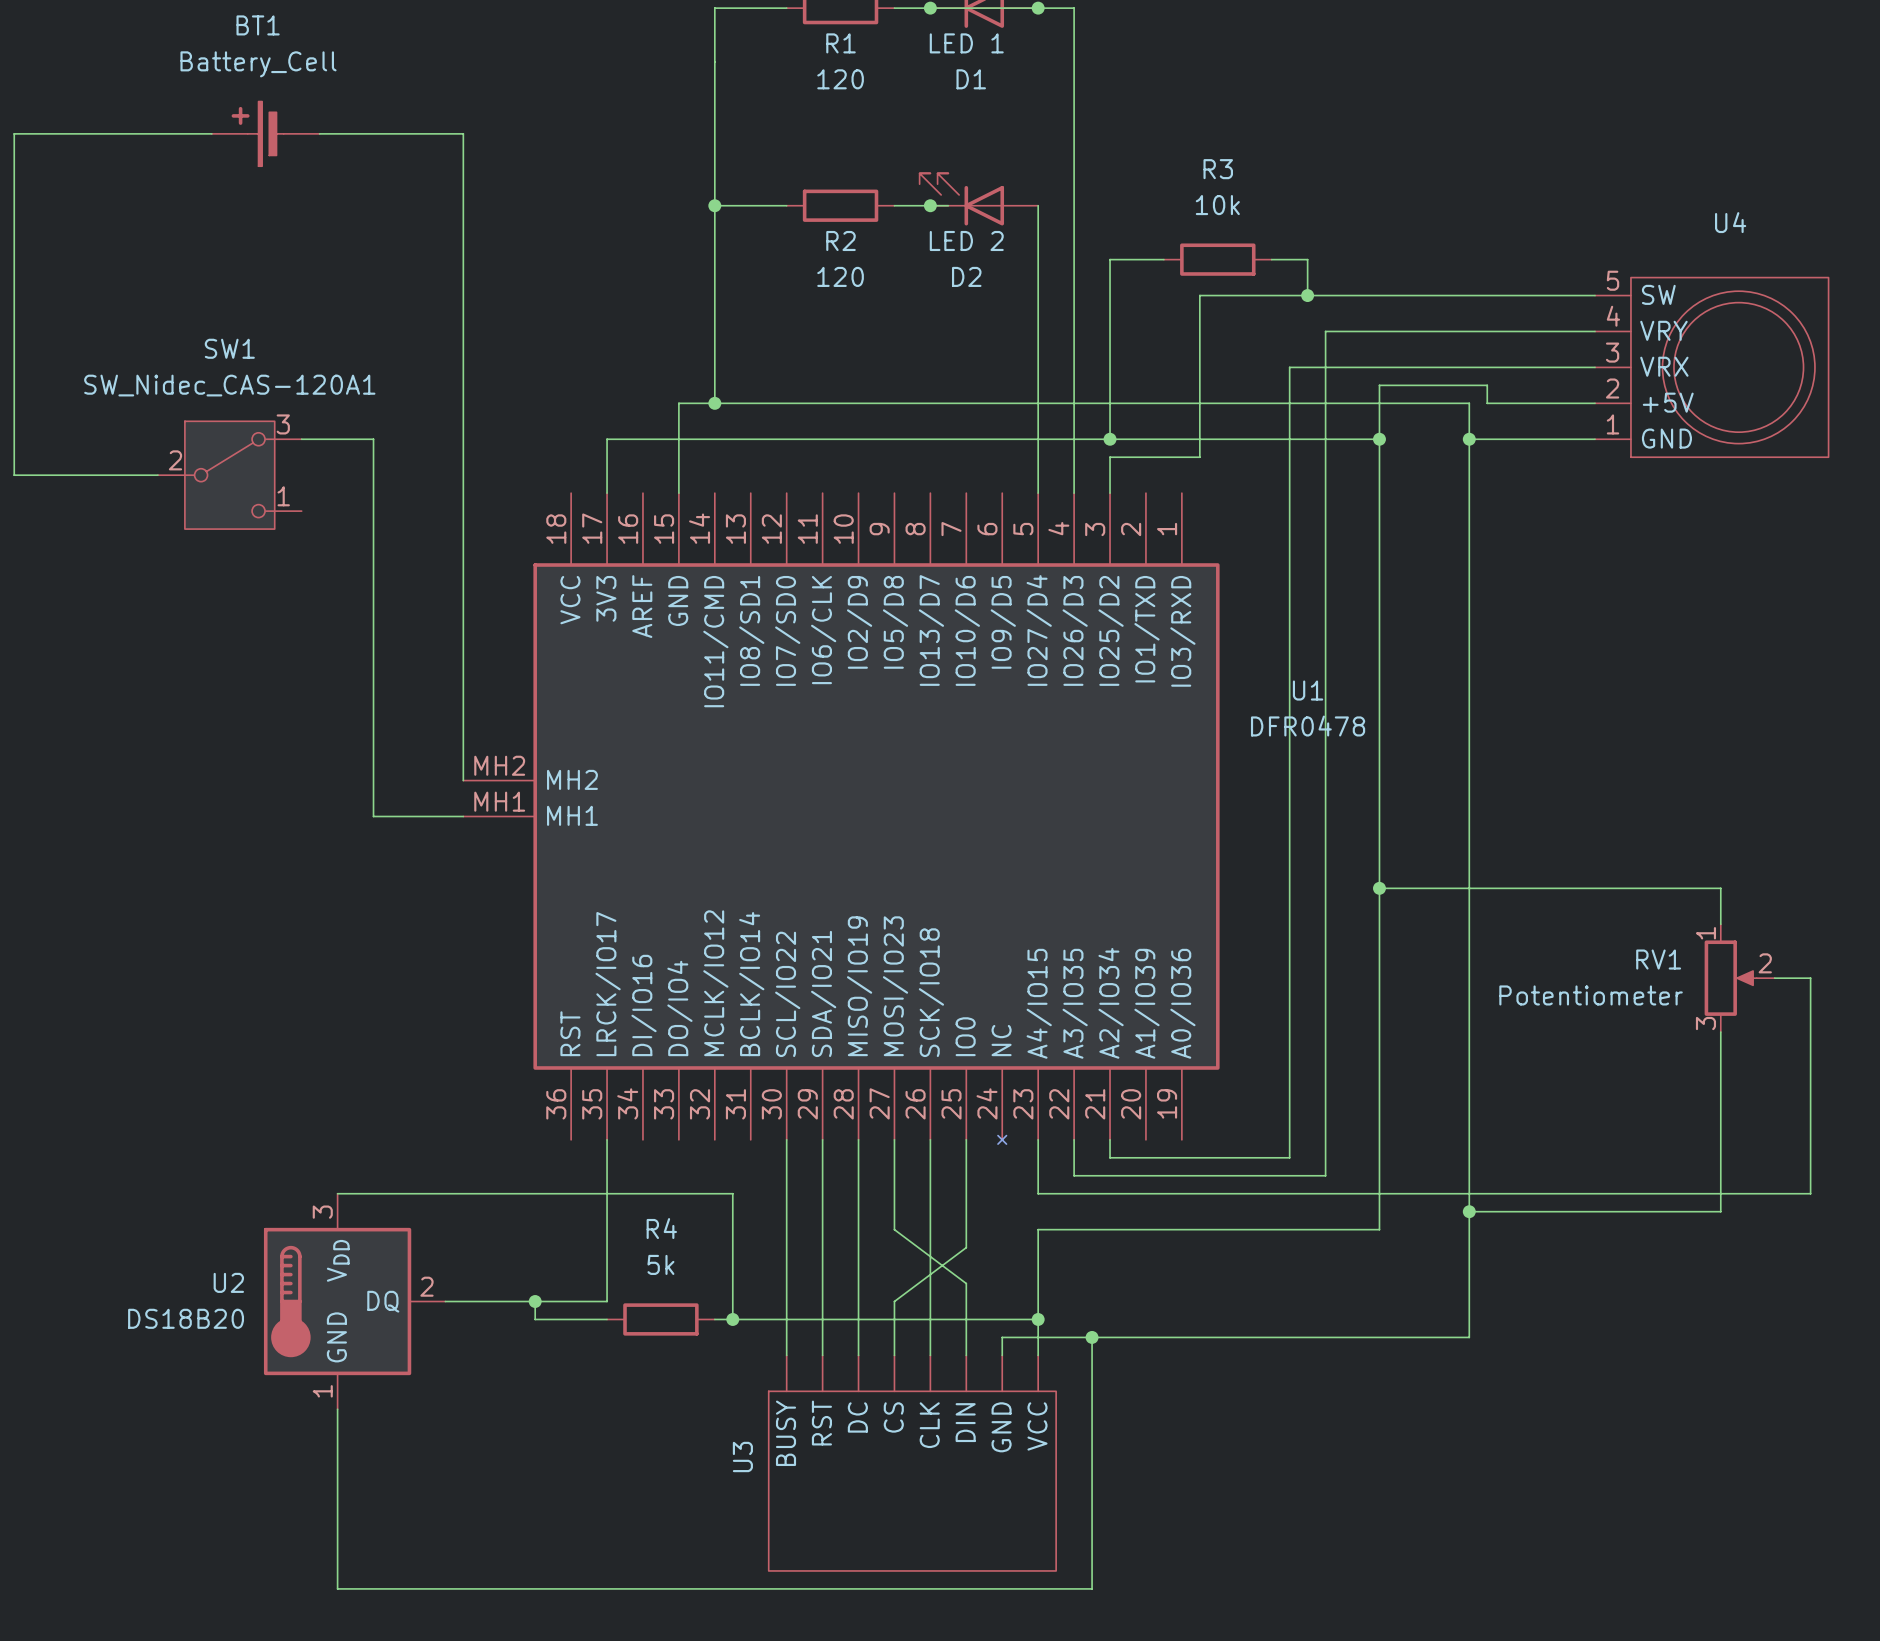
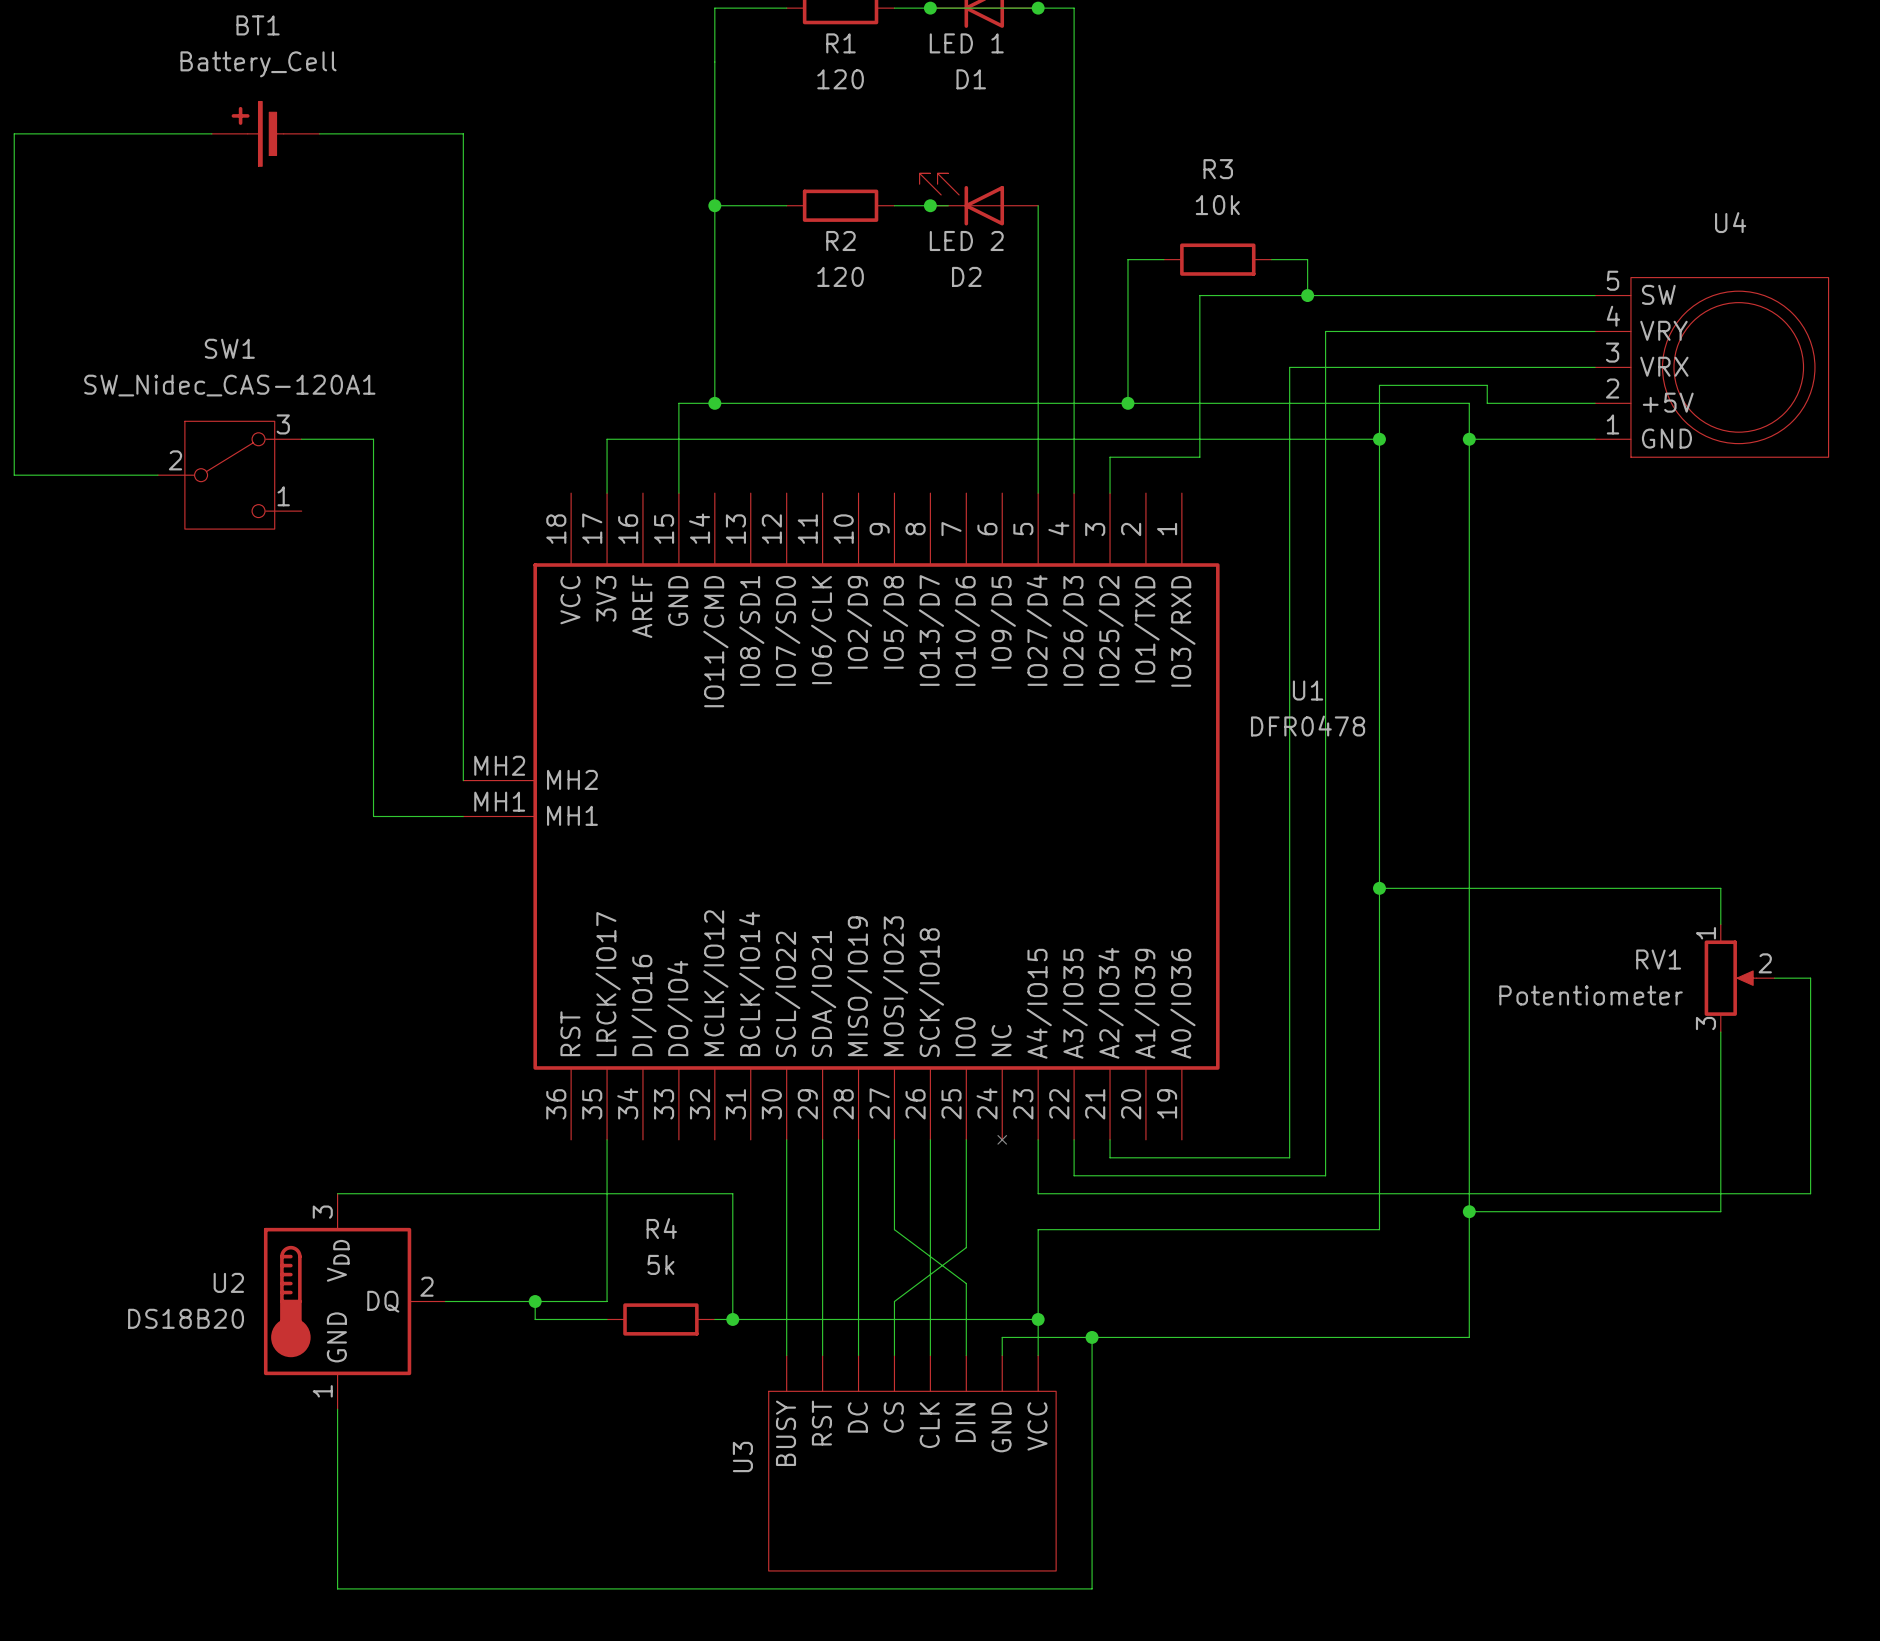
wire: (1127, 259) (1110, 259) (1110, 439) -> (1127, 259) (1127, 403)
junction position: (1110, 439) -> (1127, 403)

